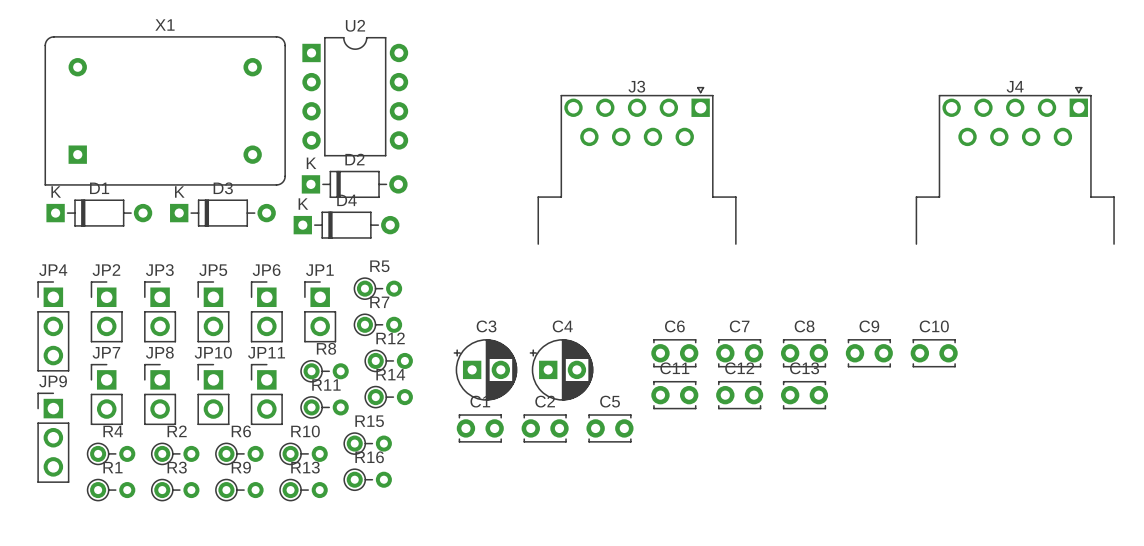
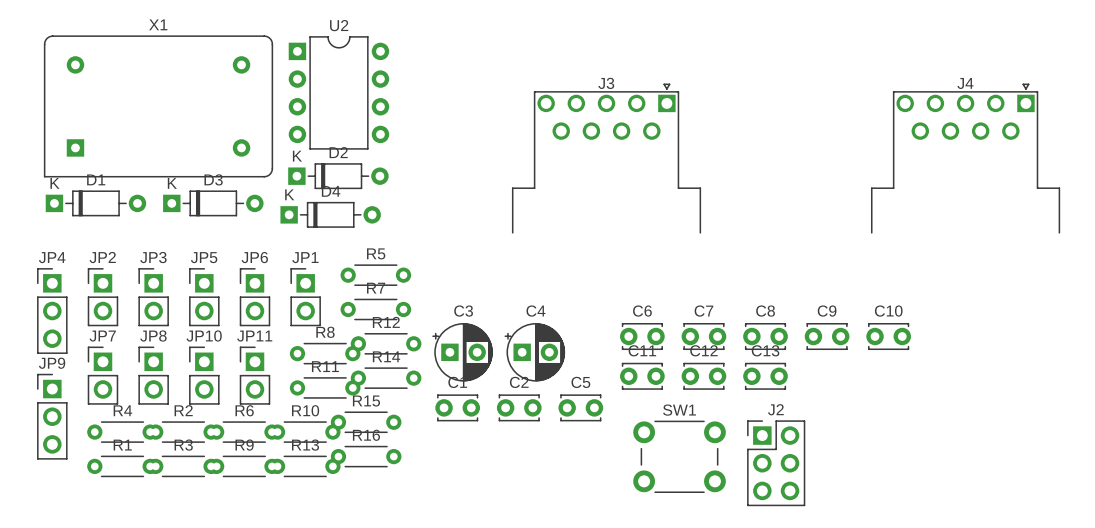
R5 footprint: [353, 277, 403, 300] -> [340, 264, 412, 286]
R7 footprint: [353, 313, 403, 337] -> [340, 298, 412, 321]
R12 footprint: [364, 349, 413, 373] -> [350, 333, 422, 355]
R8 footprint: [300, 360, 349, 383] -> [289, 342, 361, 365]
R14 footprint: [364, 385, 413, 409] -> [350, 367, 422, 389]
R11 footprint: [300, 396, 349, 419] -> [289, 377, 361, 399]
R15 footprint: [343, 432, 392, 455] -> [330, 411, 402, 433]
R4 footprint: [86, 442, 136, 466] -> [87, 421, 158, 443]
R2 footprint: [151, 442, 200, 466] -> [148, 421, 219, 443]
R6 footprint: [215, 442, 264, 466] -> [209, 421, 280, 443]
R10 footprint: [279, 442, 328, 466] -> [269, 421, 341, 443]
R16 footprint: [343, 468, 392, 491] -> [330, 445, 402, 468]
R1 footprint: [86, 478, 136, 502] -> [87, 455, 158, 478]
R3 footprint: [151, 478, 200, 502] -> [148, 455, 219, 478]
R9 footprint: [215, 478, 264, 502] -> [209, 455, 280, 478]
R13 footprint: [279, 478, 328, 502] -> [269, 455, 341, 478]
SW1: none -> (679, 456)
J2: none -> (776, 463)

